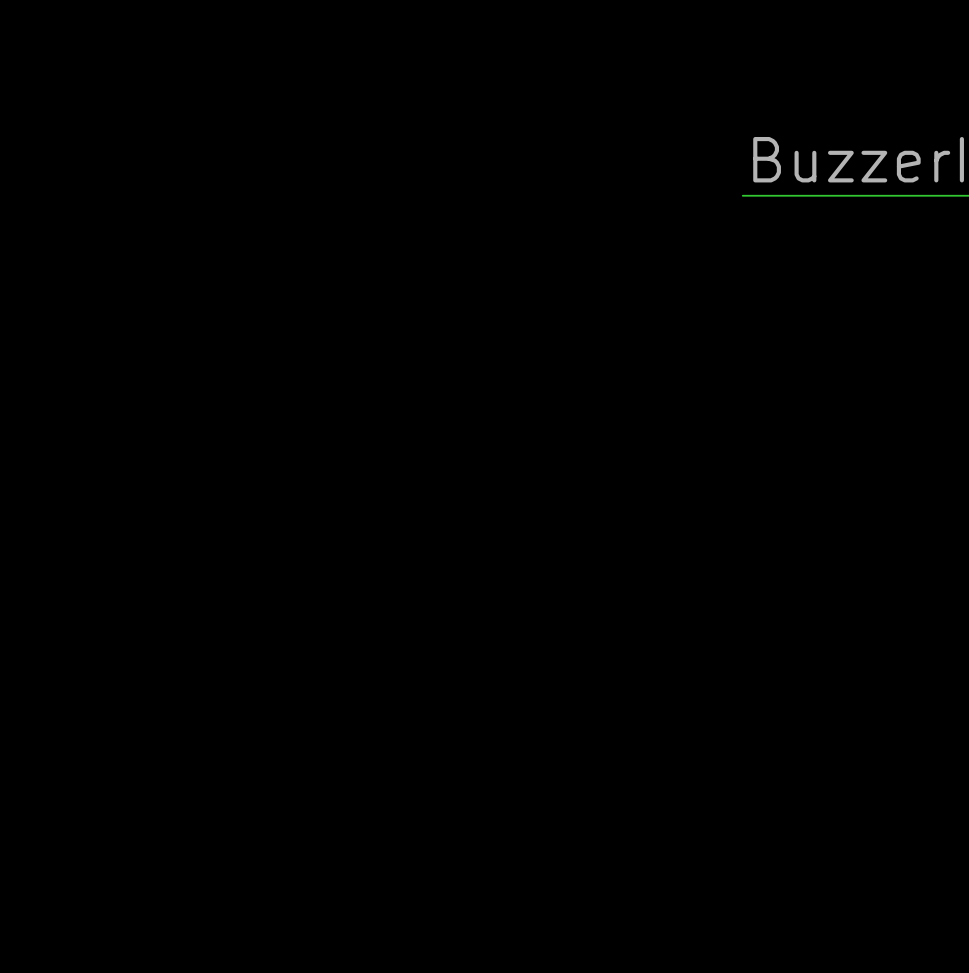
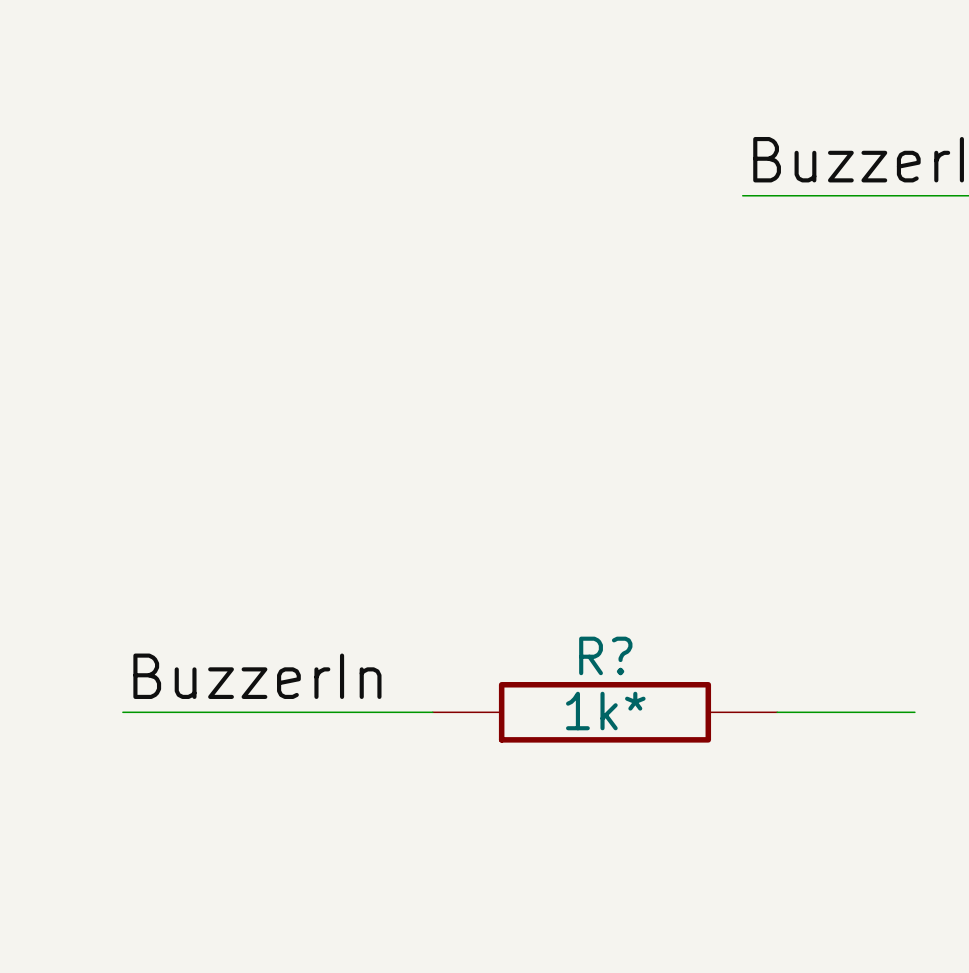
label: none -> BuzzerIn (257, 676)
wire: none -> (122, 712) (432, 712)
R?: none -> 1k* (604, 712)
wire: none -> (777, 712) (914, 712)

